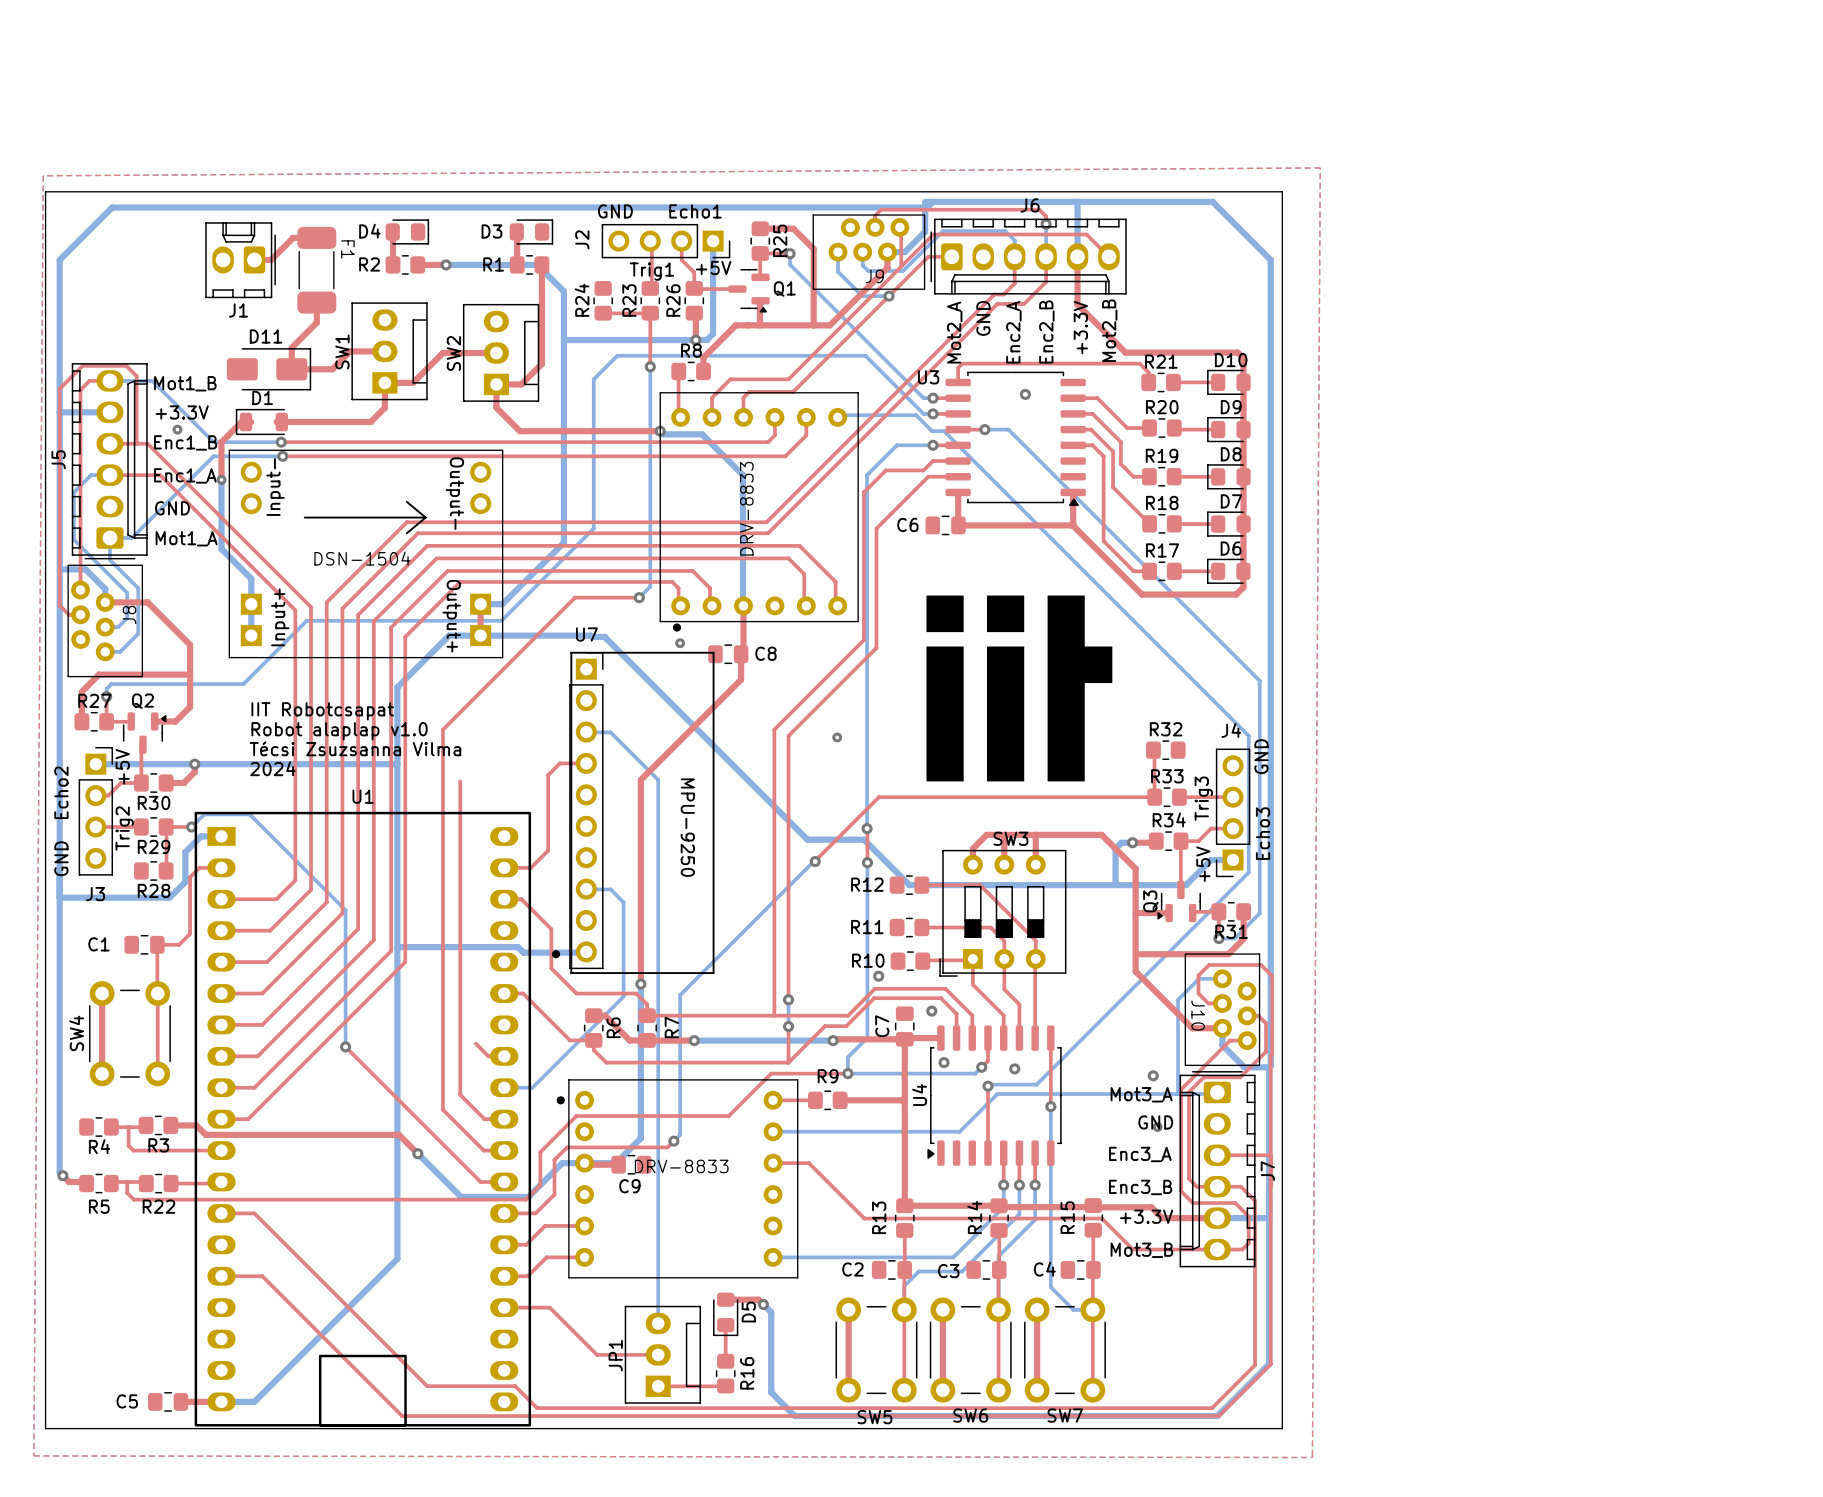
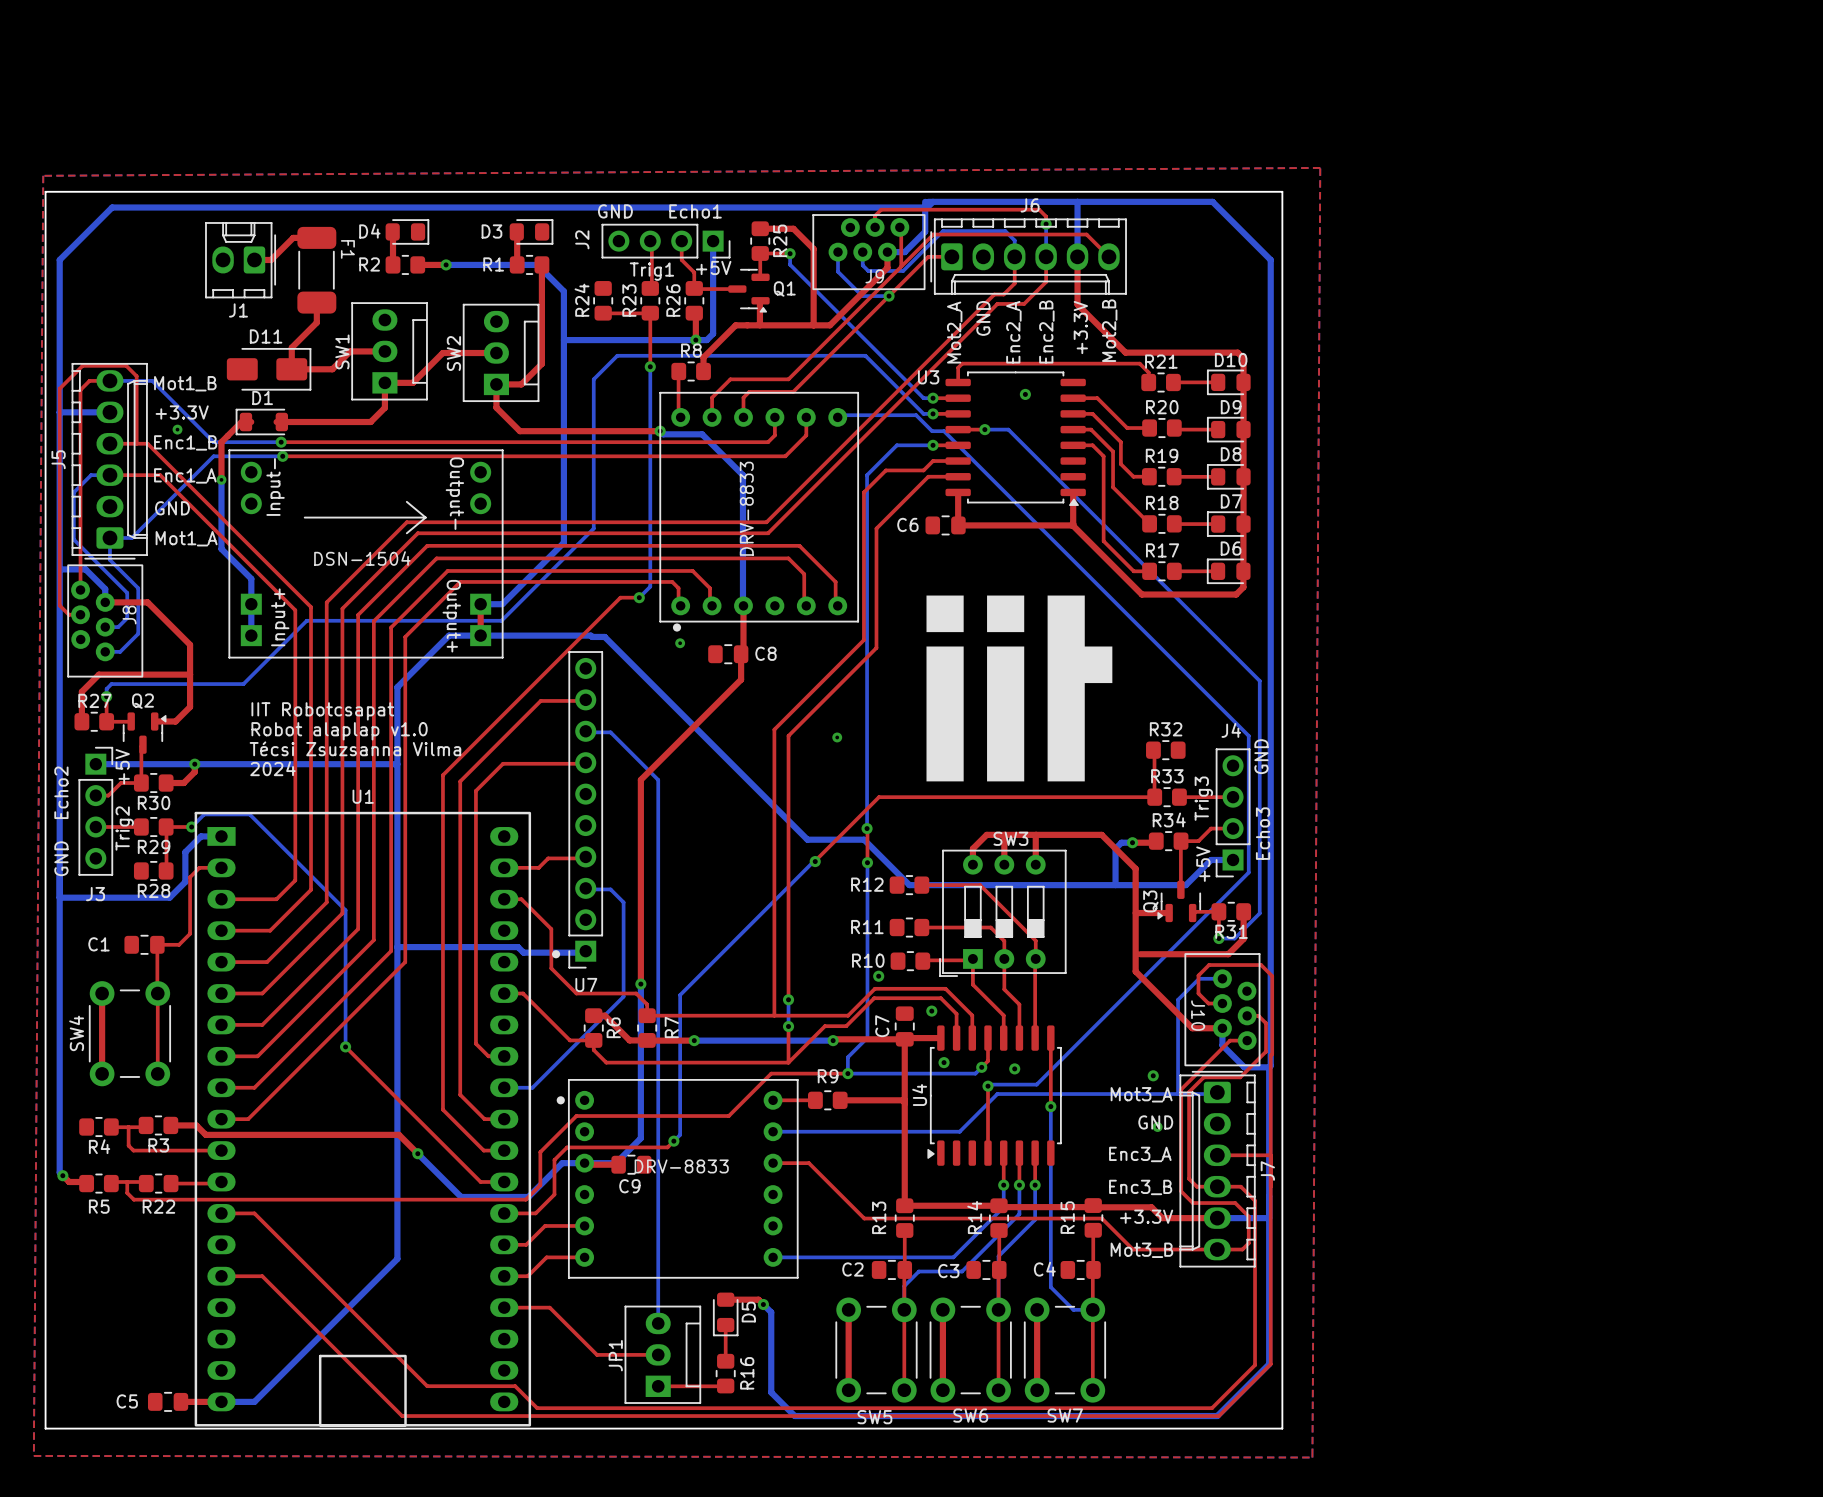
top track: (620, 597) (574, 597) (442, 729) (442, 775) -> (620, 597) (442, 775)
line: (571, 652) (713, 652) (713, 973) (571, 973) (571, 652) -> none
top track: none -> (587, 700) (540, 700) (460, 781)
top track: (586, 763) (559, 763) (548, 775) (548, 850) (530, 867) -> (587, 858) (548, 858) (538, 867) (530, 867)
top track: none -> (587, 763) (503, 763) (475, 790) (475, 1043)
U7 rotation: 0° (586, 810) -> 180° (585, 809)
text: MPU-9250 (687, 827) -> none

